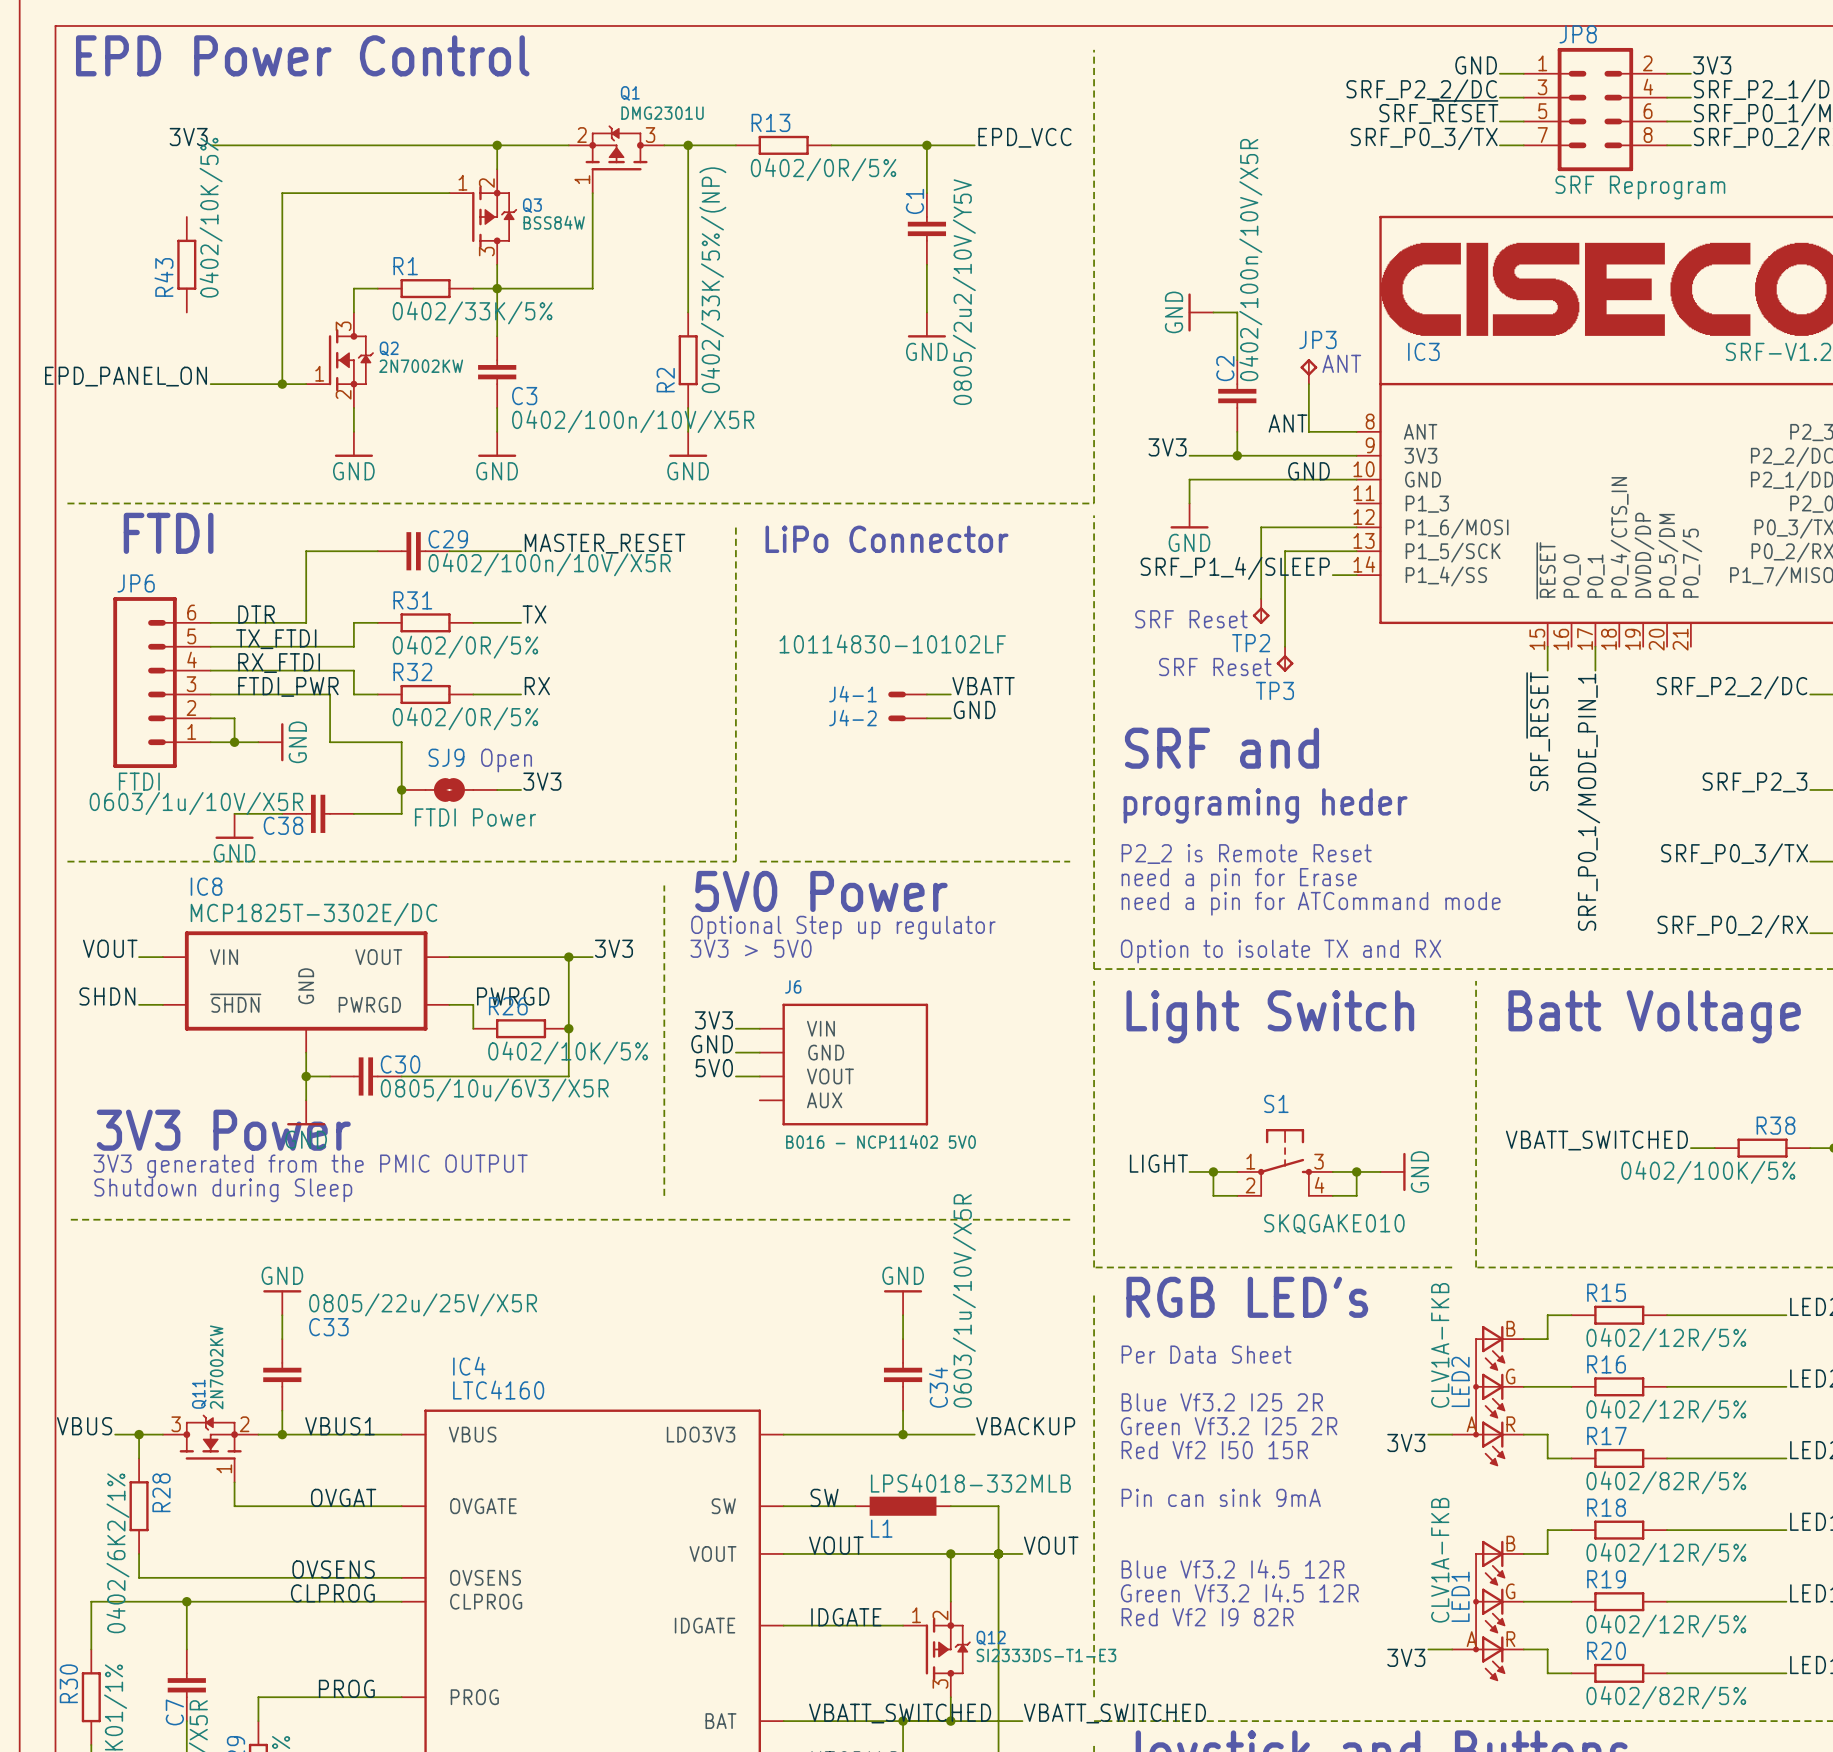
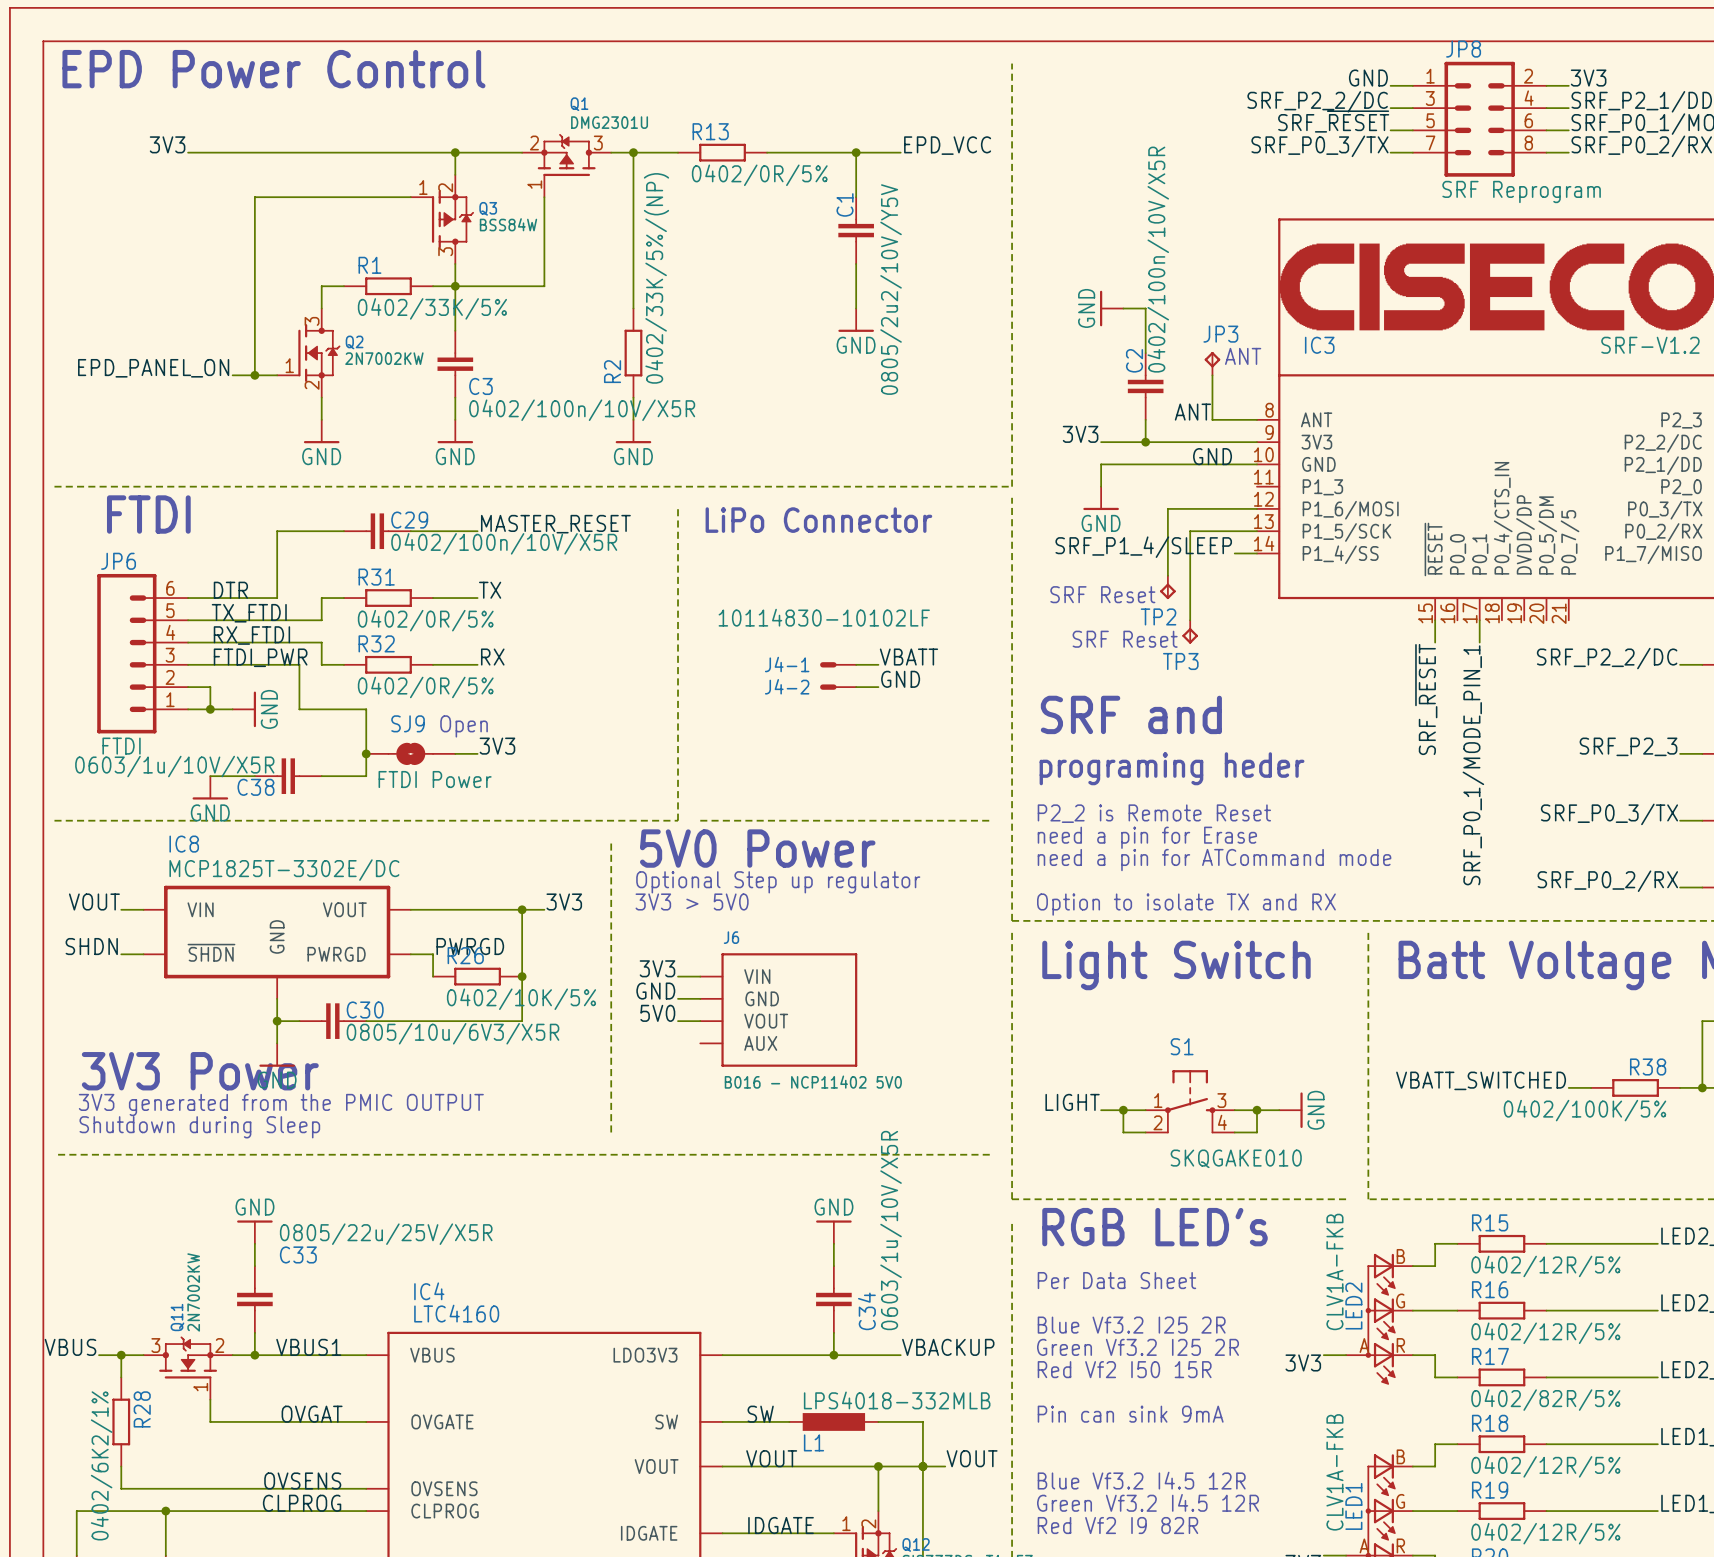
R43: 0402/10K/5% (186, 264) -> none
label position: EPD_PANEL_ON (126, 376) -> EPD_PANEL_ON (153, 368)
wire: (210, 384) (258, 384) -> none

